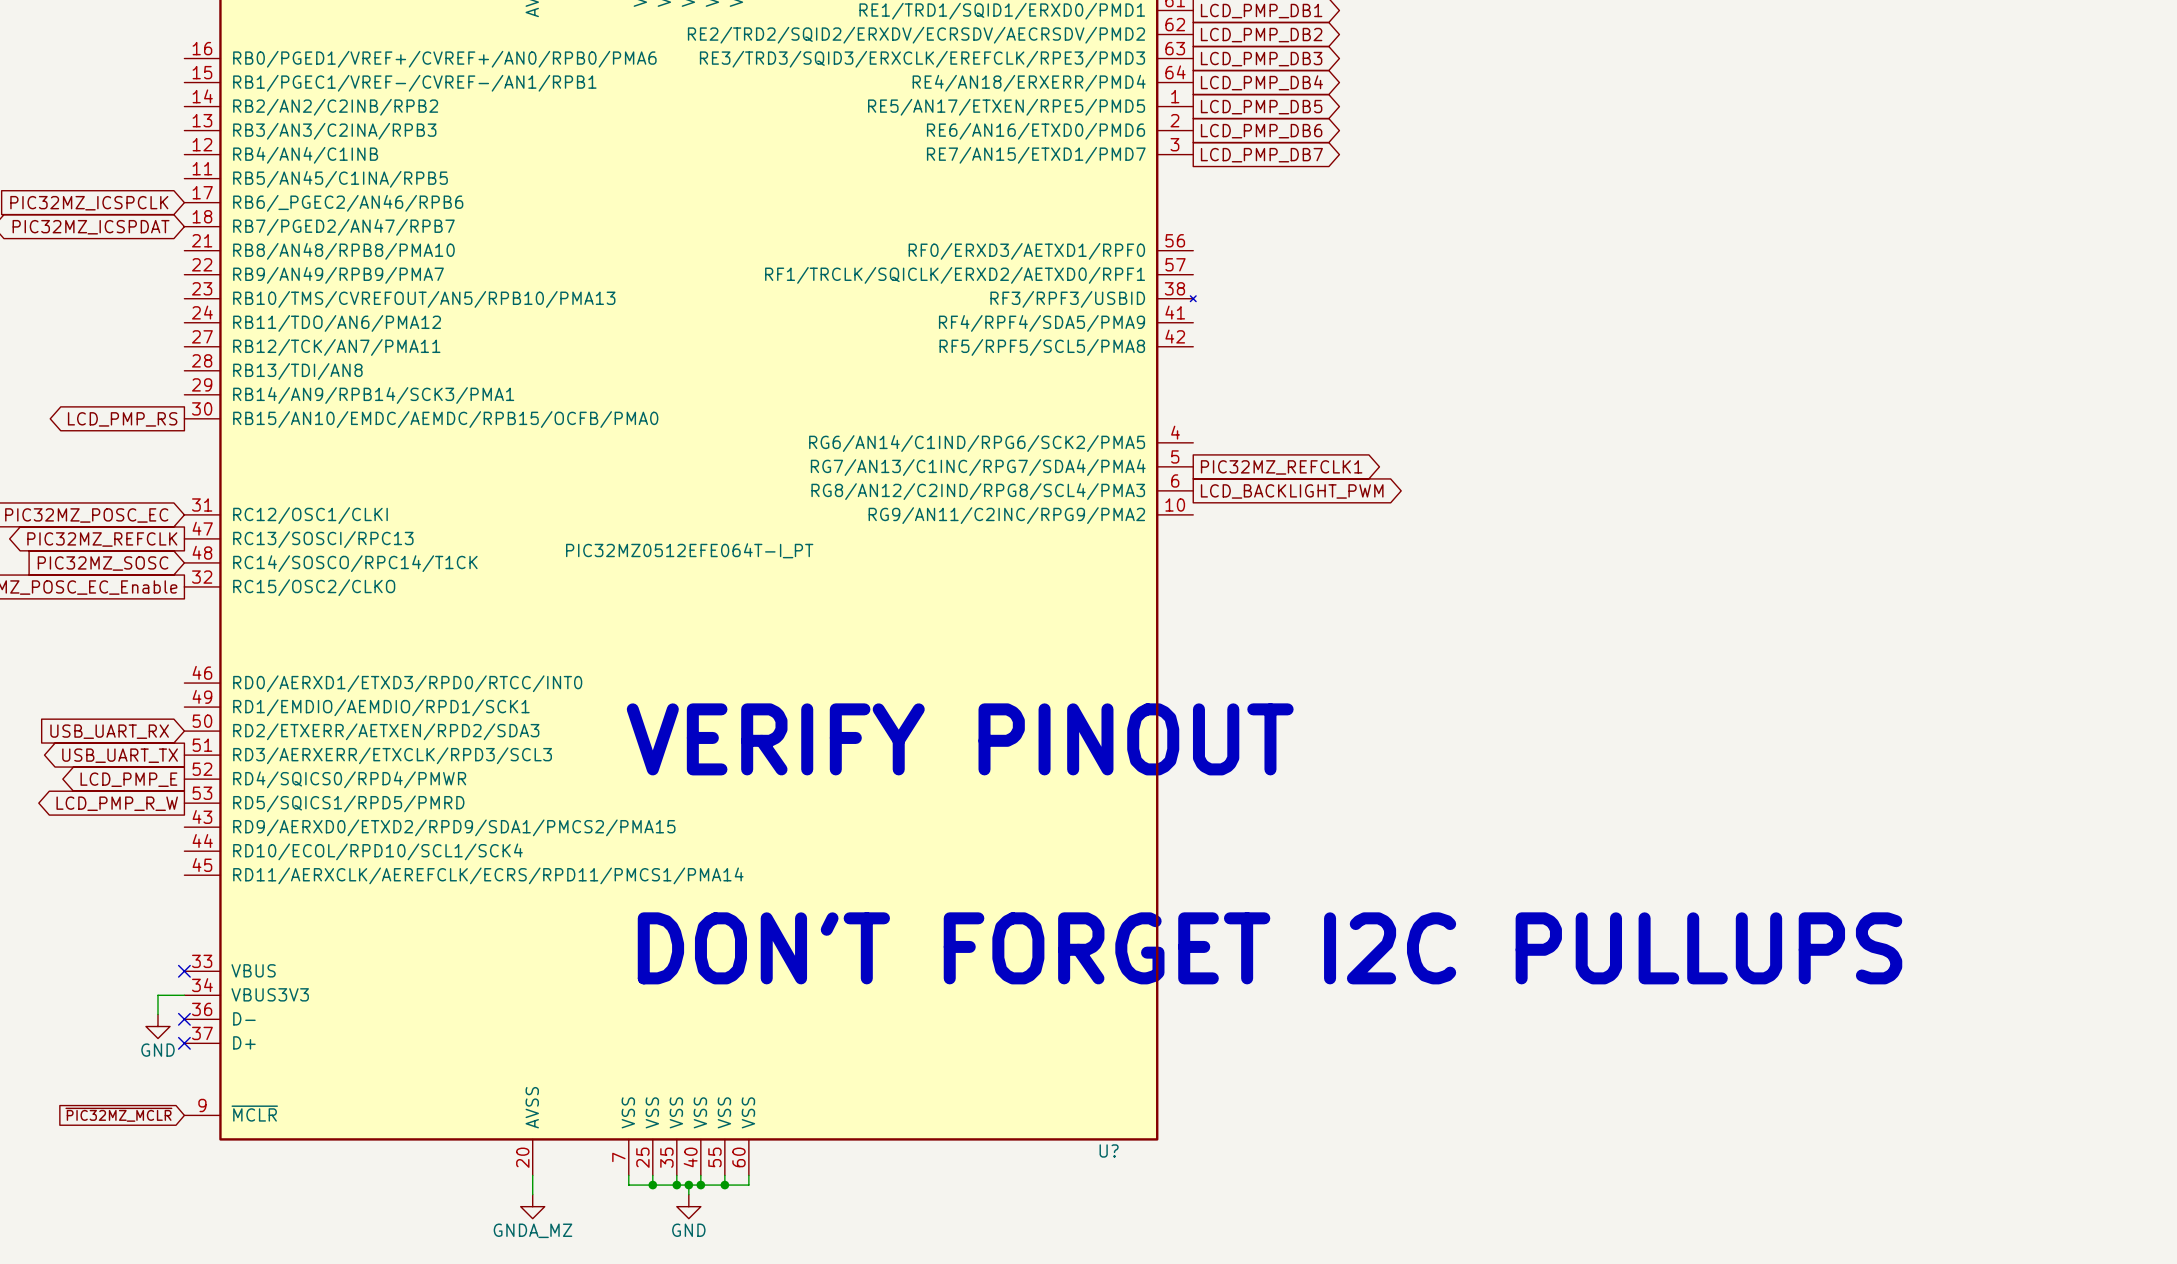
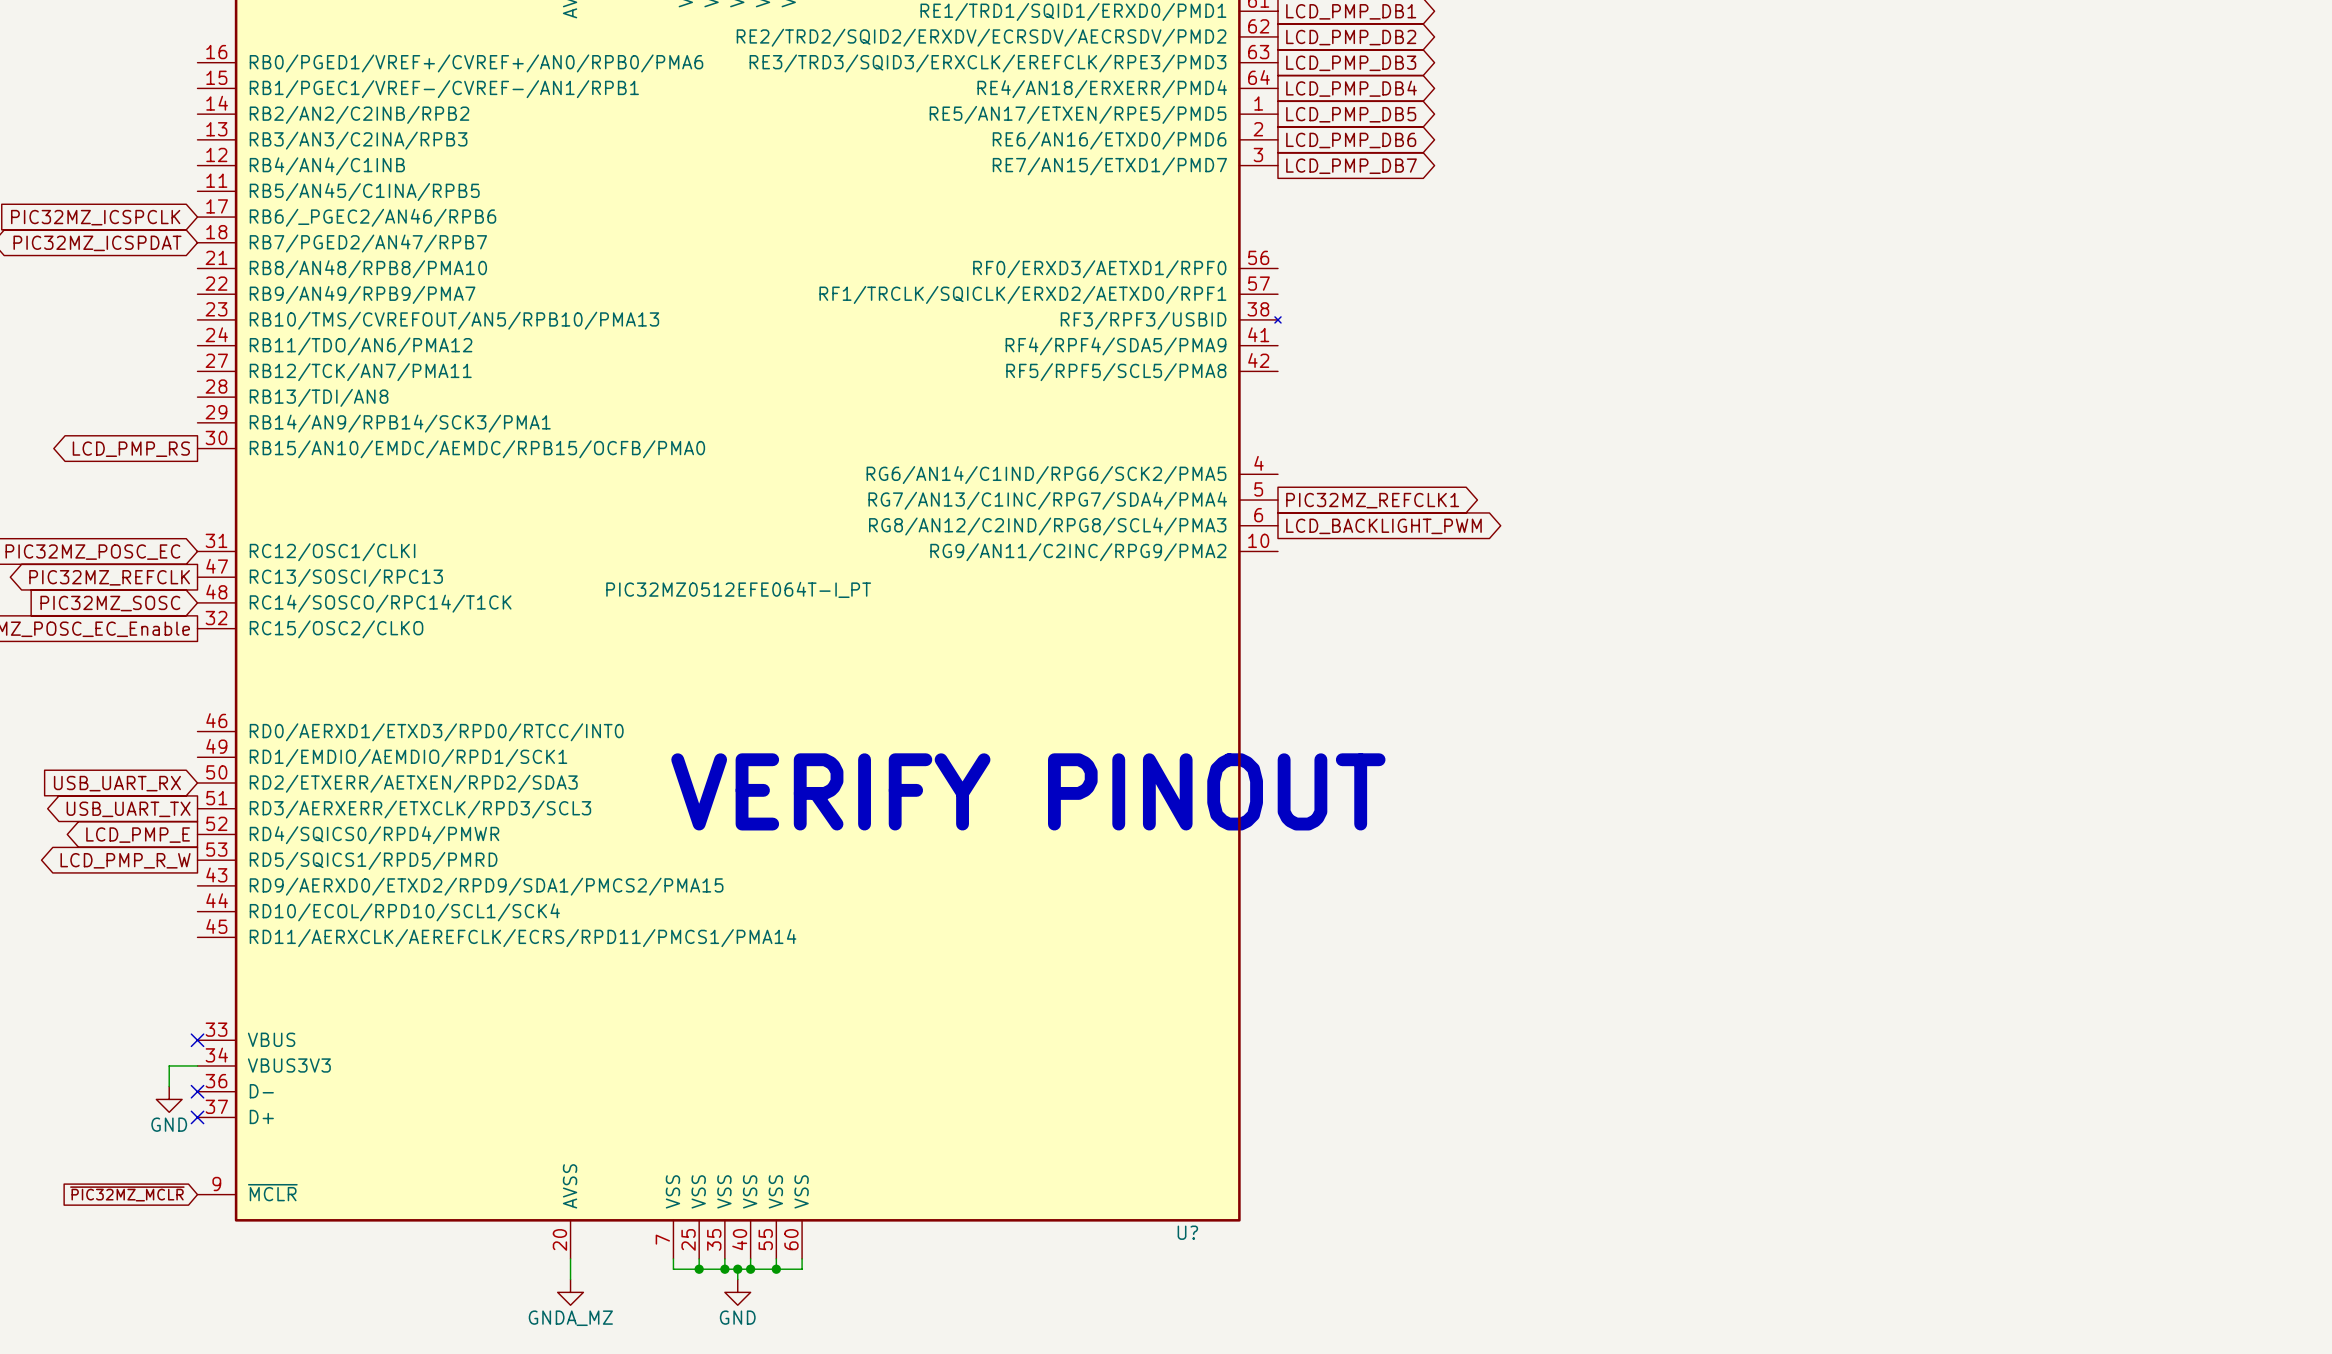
text: DON'T FORGET I2C PULLUPS (1270, 948) -> none

